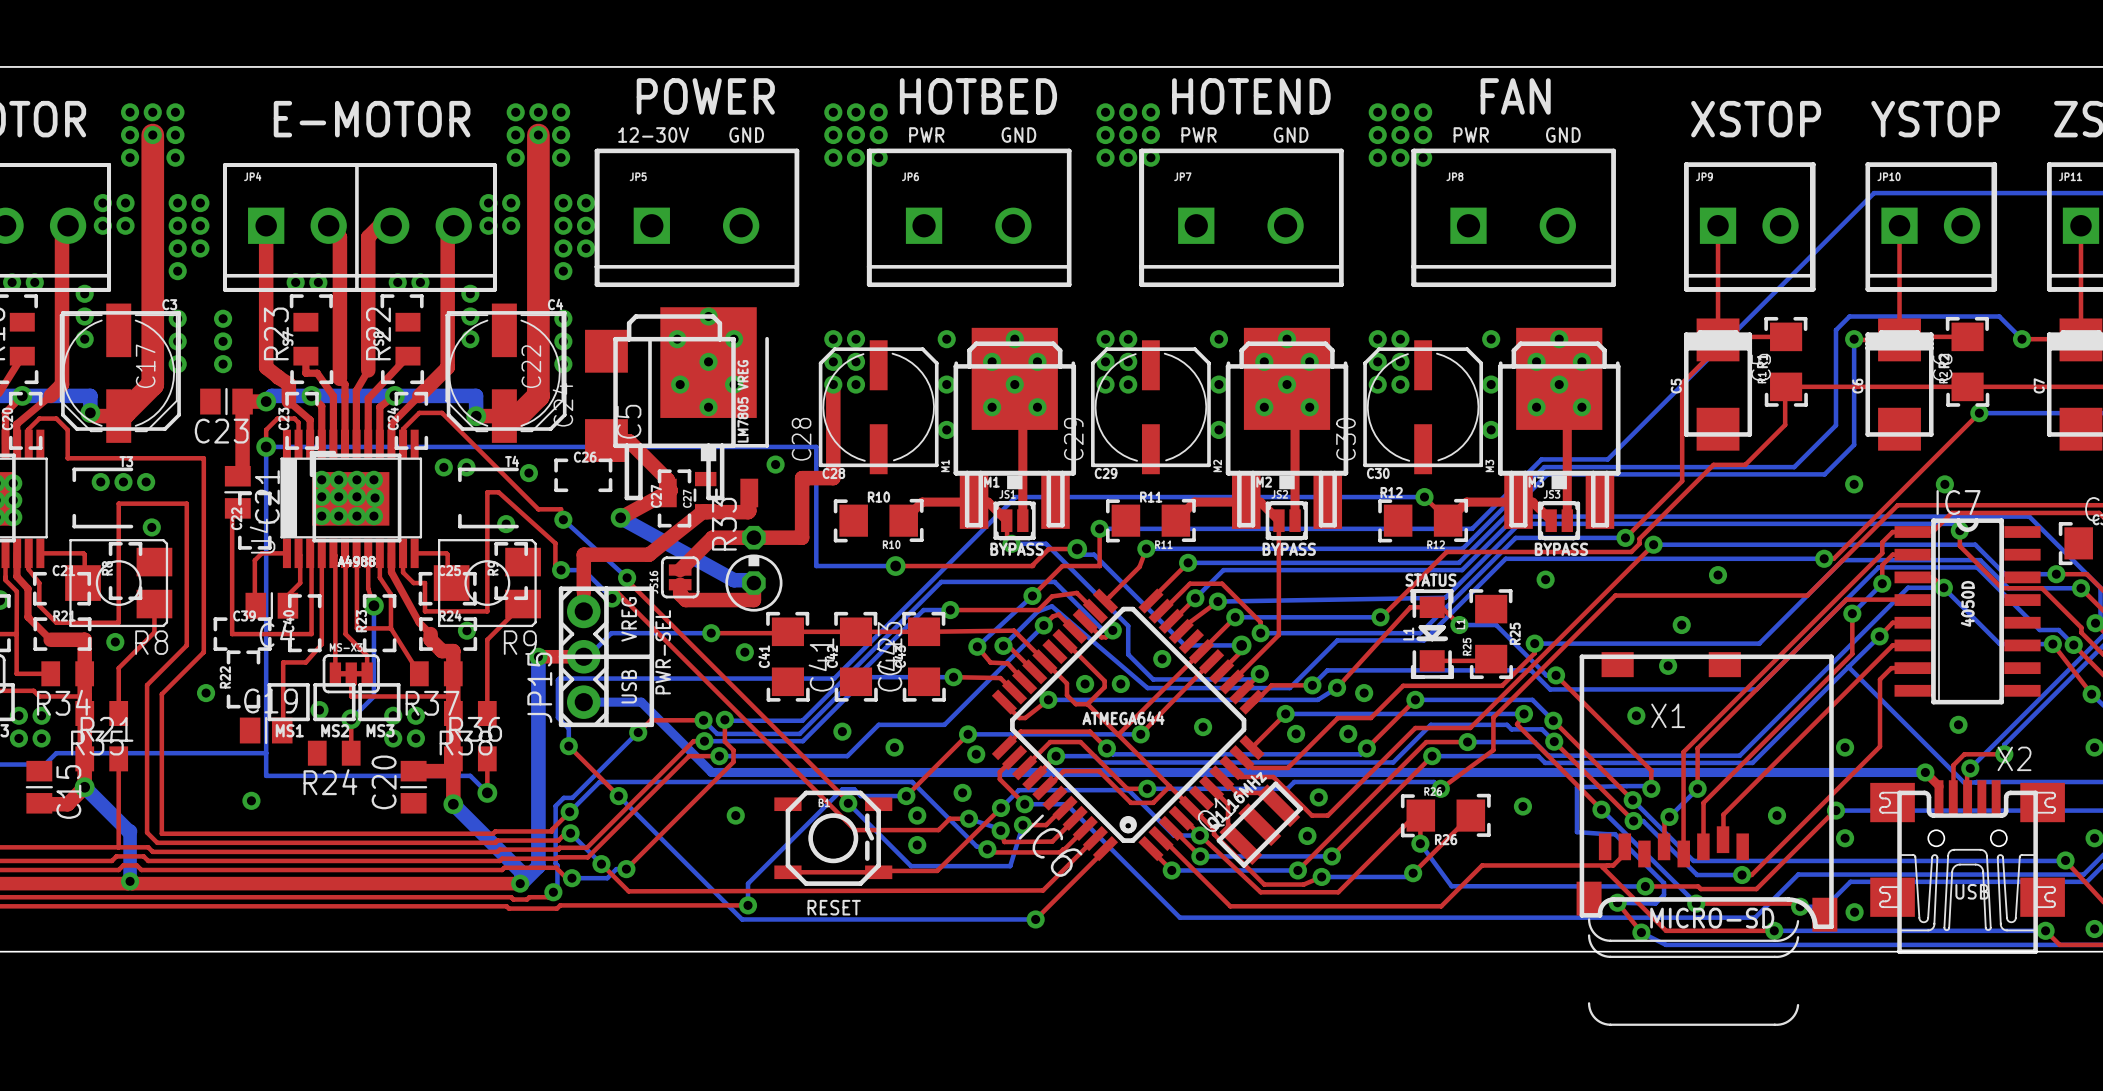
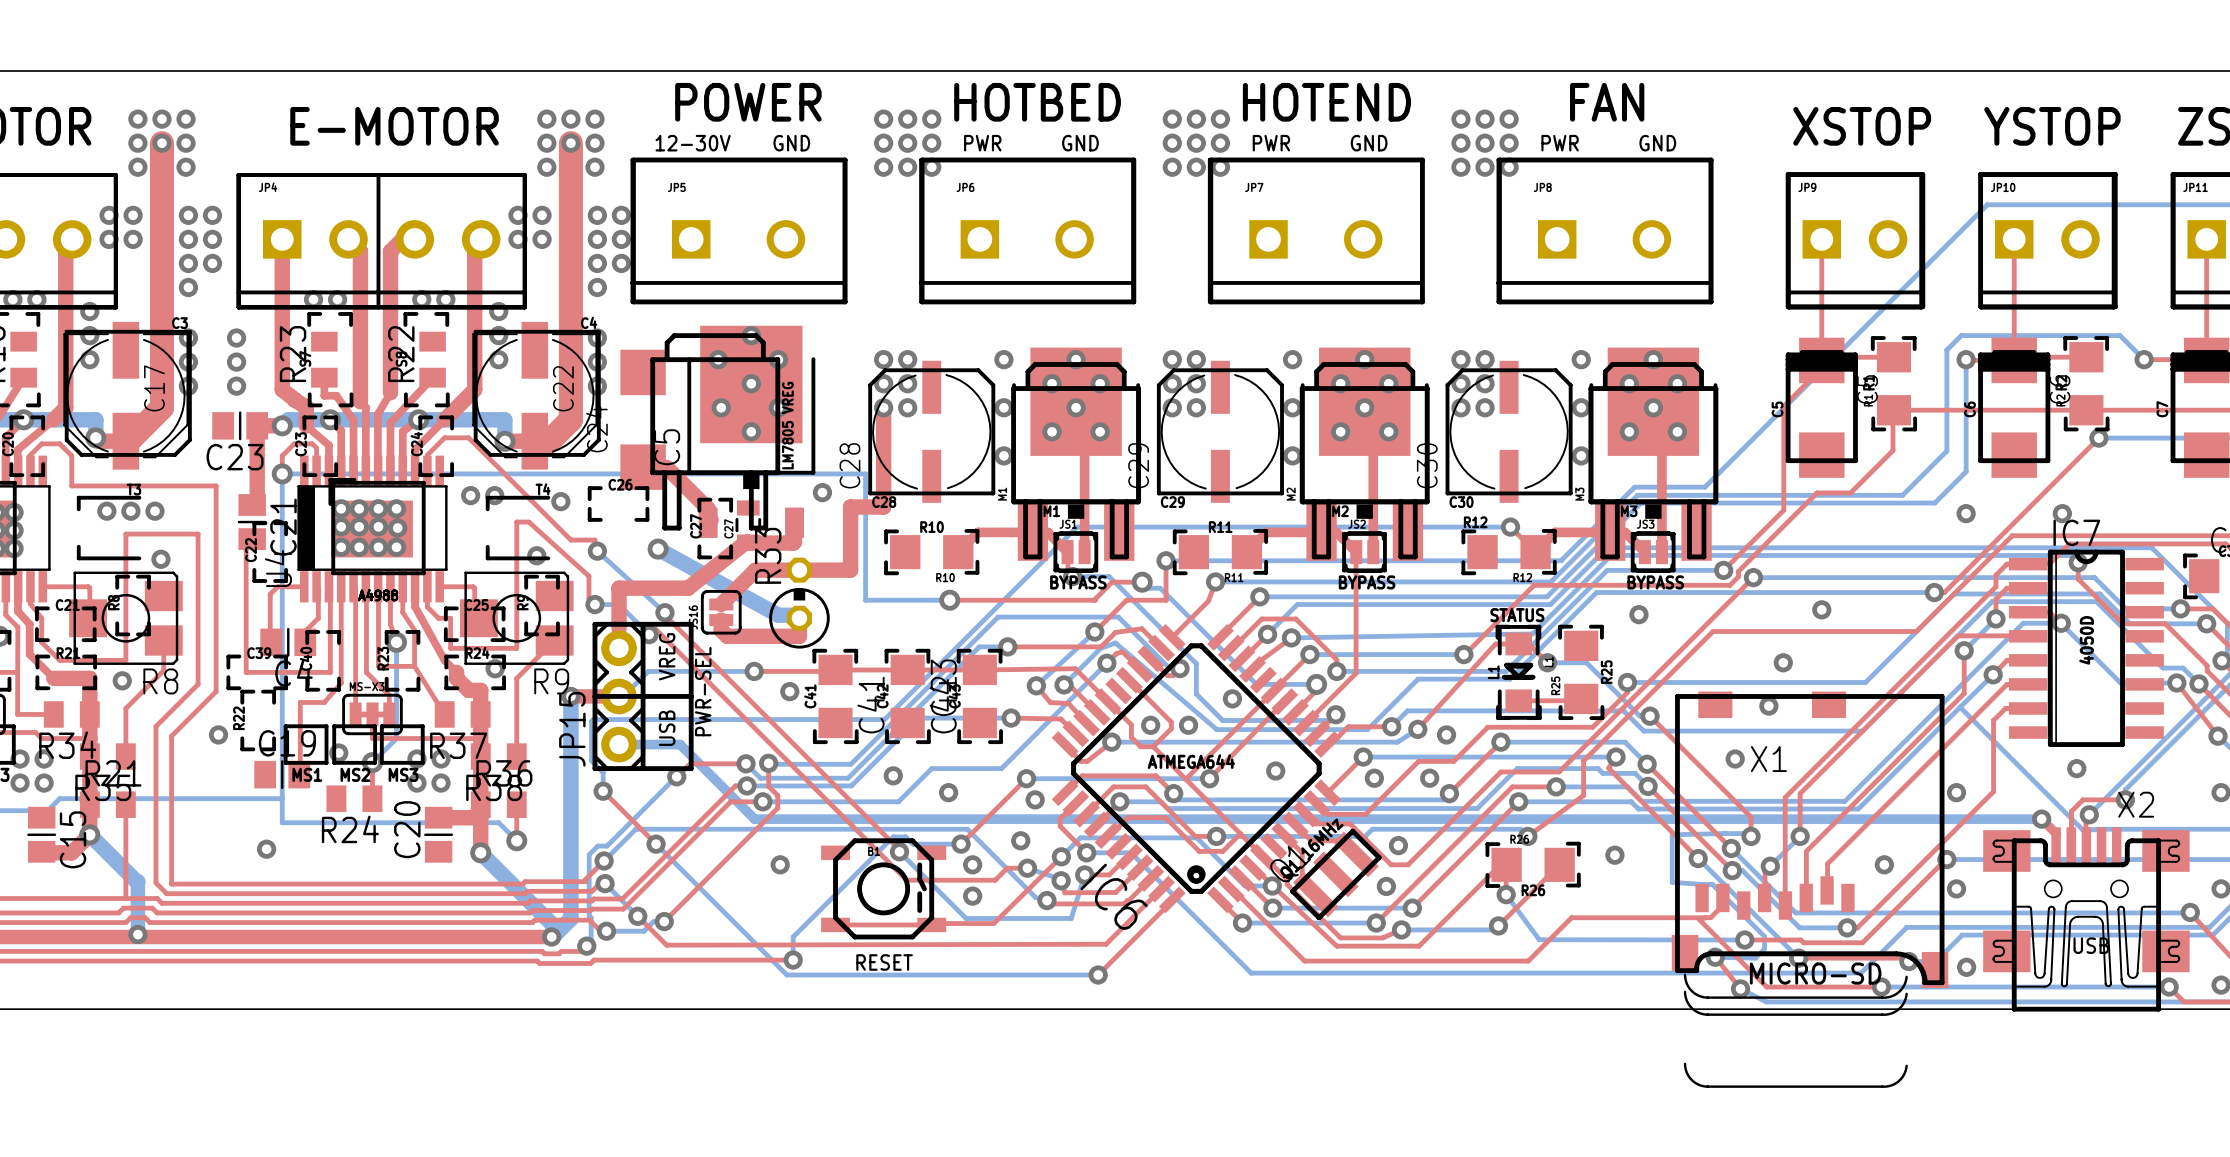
top track: (670, 490) (620, 517) -> none

